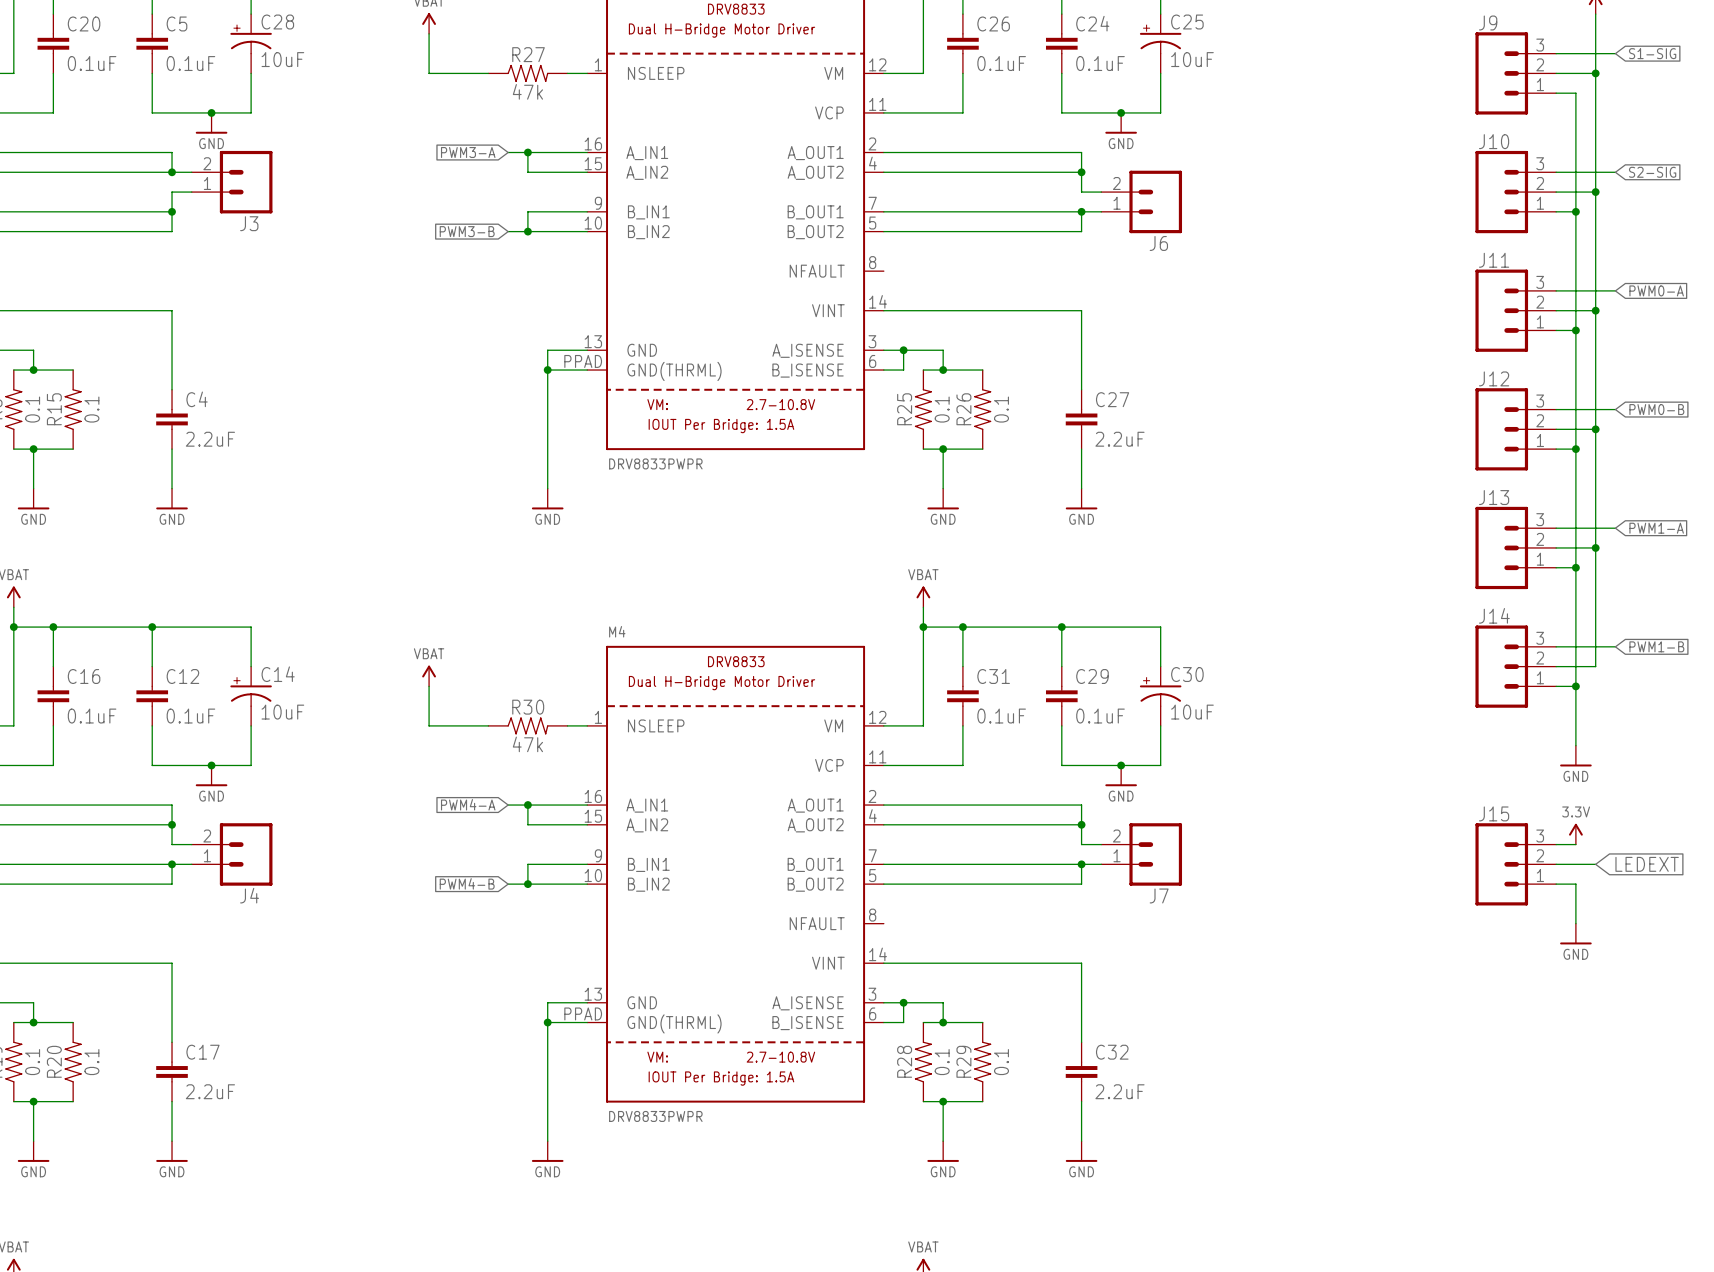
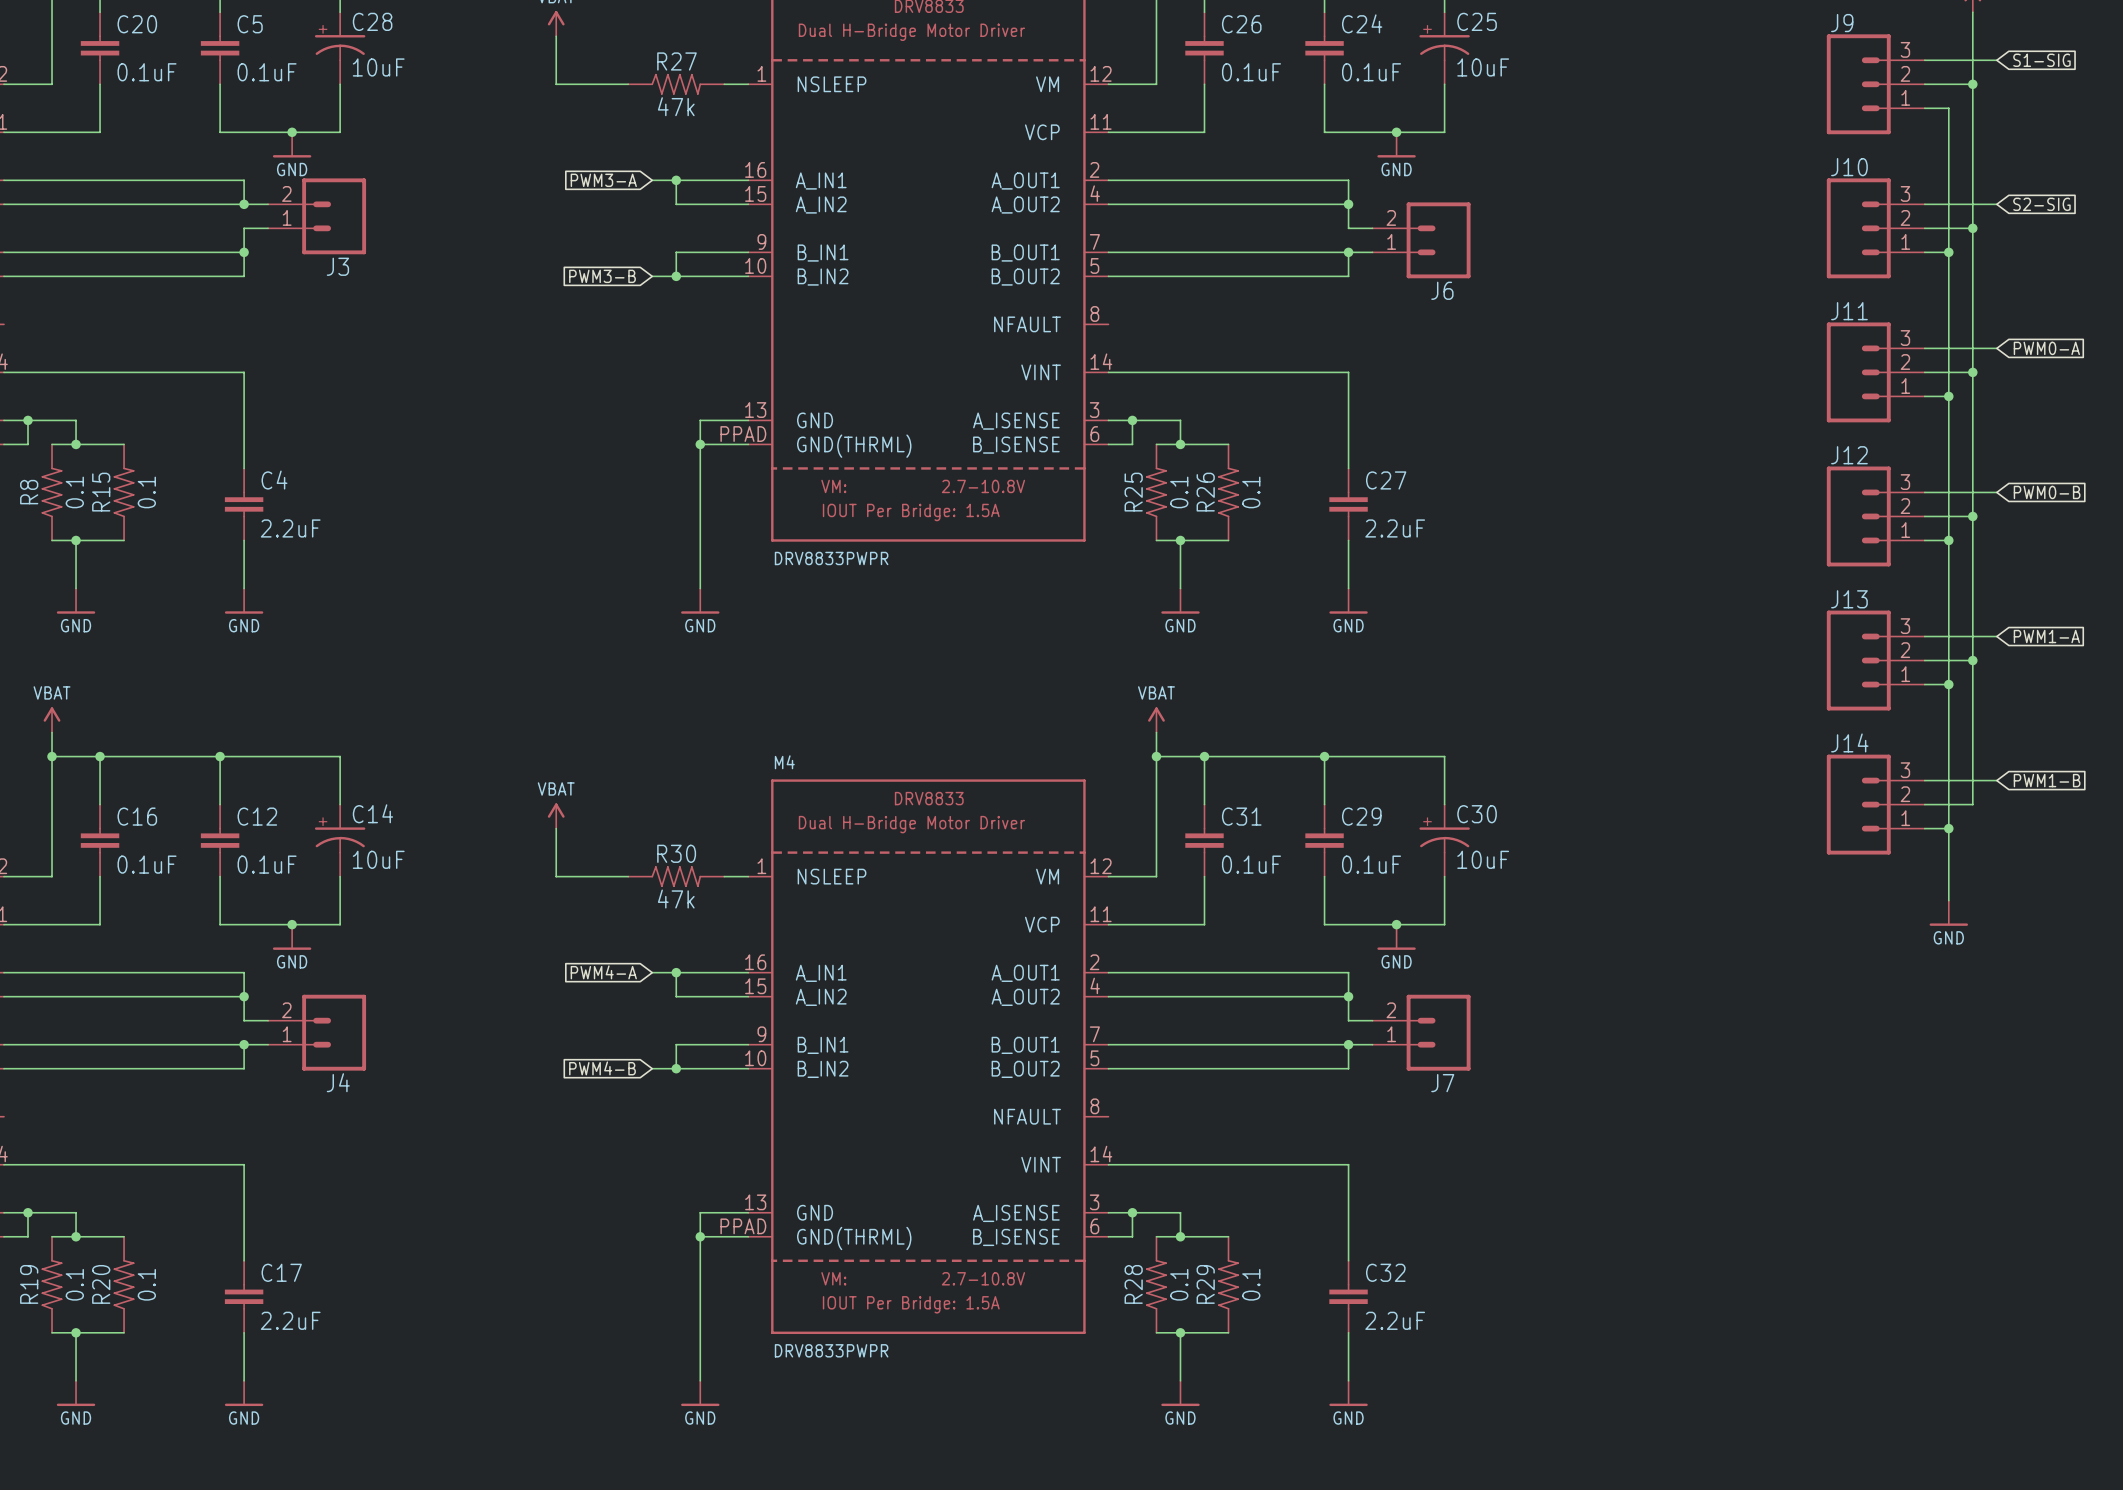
power symbol: 3.3V (1575, 834) -> none
wire: (1556, 844) (1575, 844) -> none
J15: (1515, 864) -> none
wire: (1556, 864) (1595, 864) -> none
global label: LEDEXT (1647, 864) -> none
wire: (1556, 884) (1575, 884) (1575, 923) -> none
power symbol: GND (1575, 934) -> none

